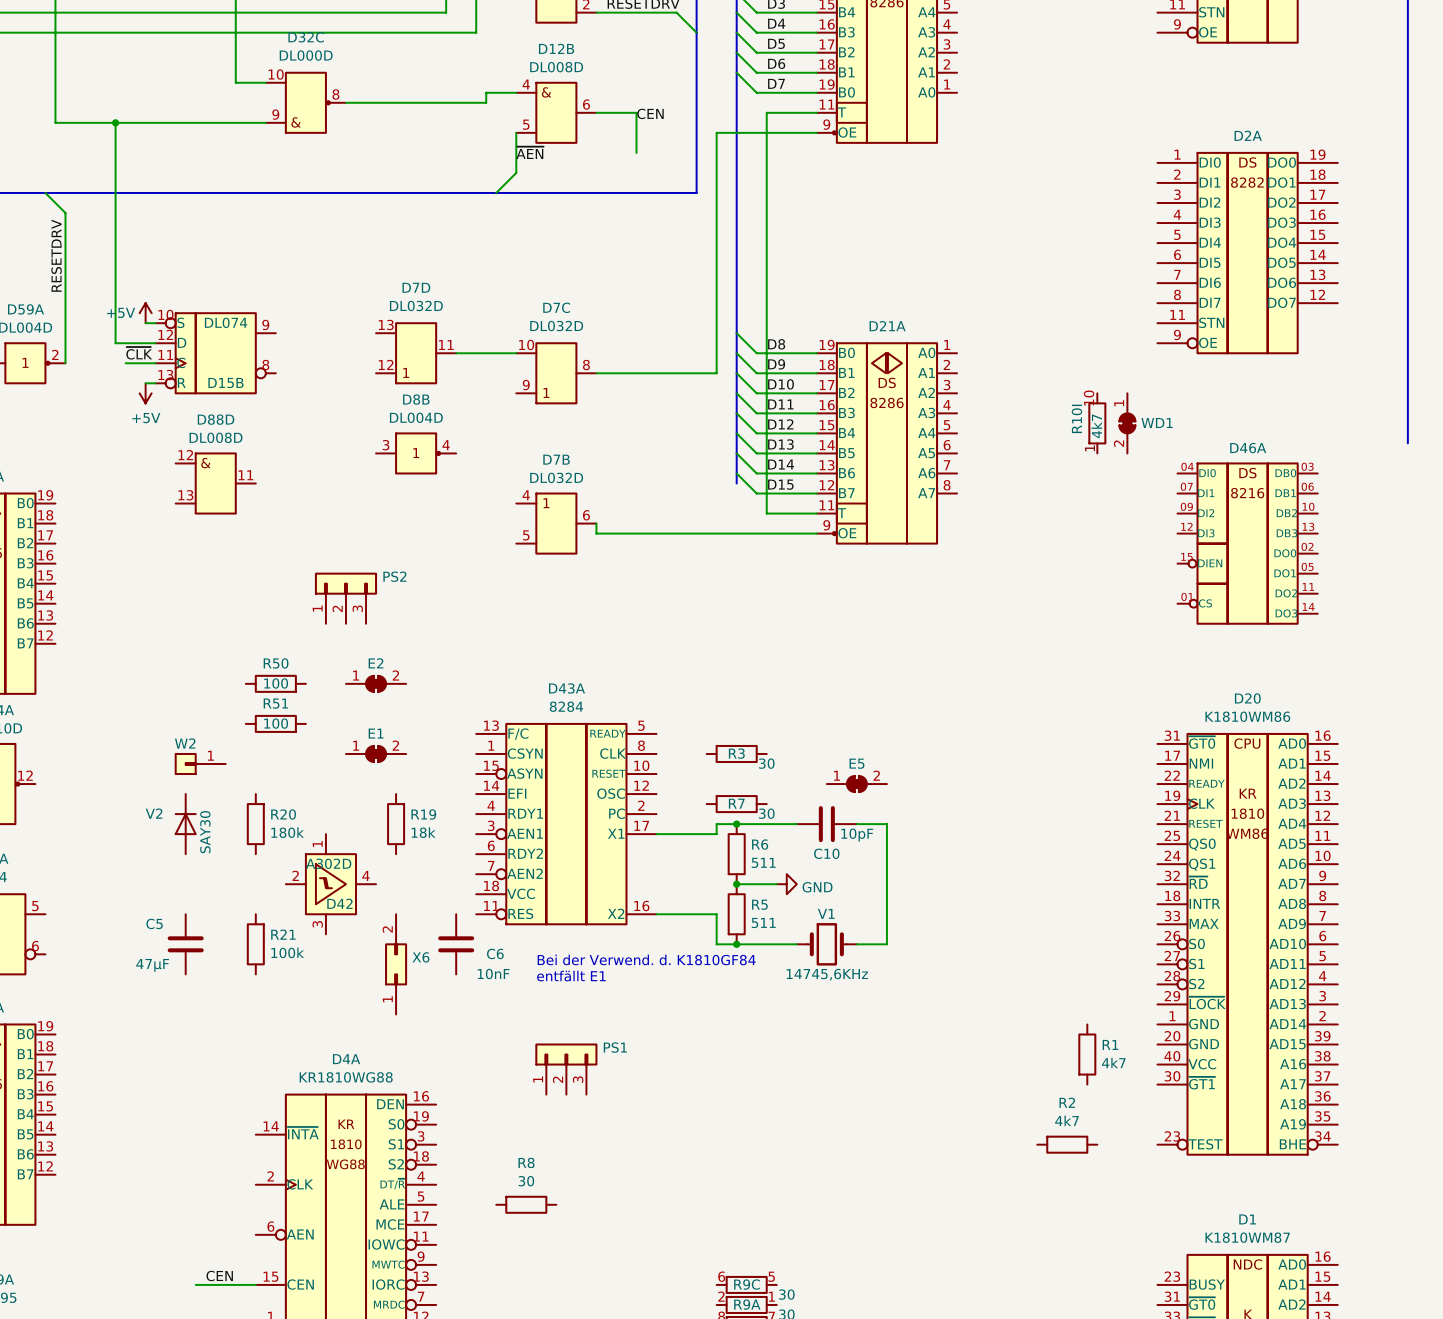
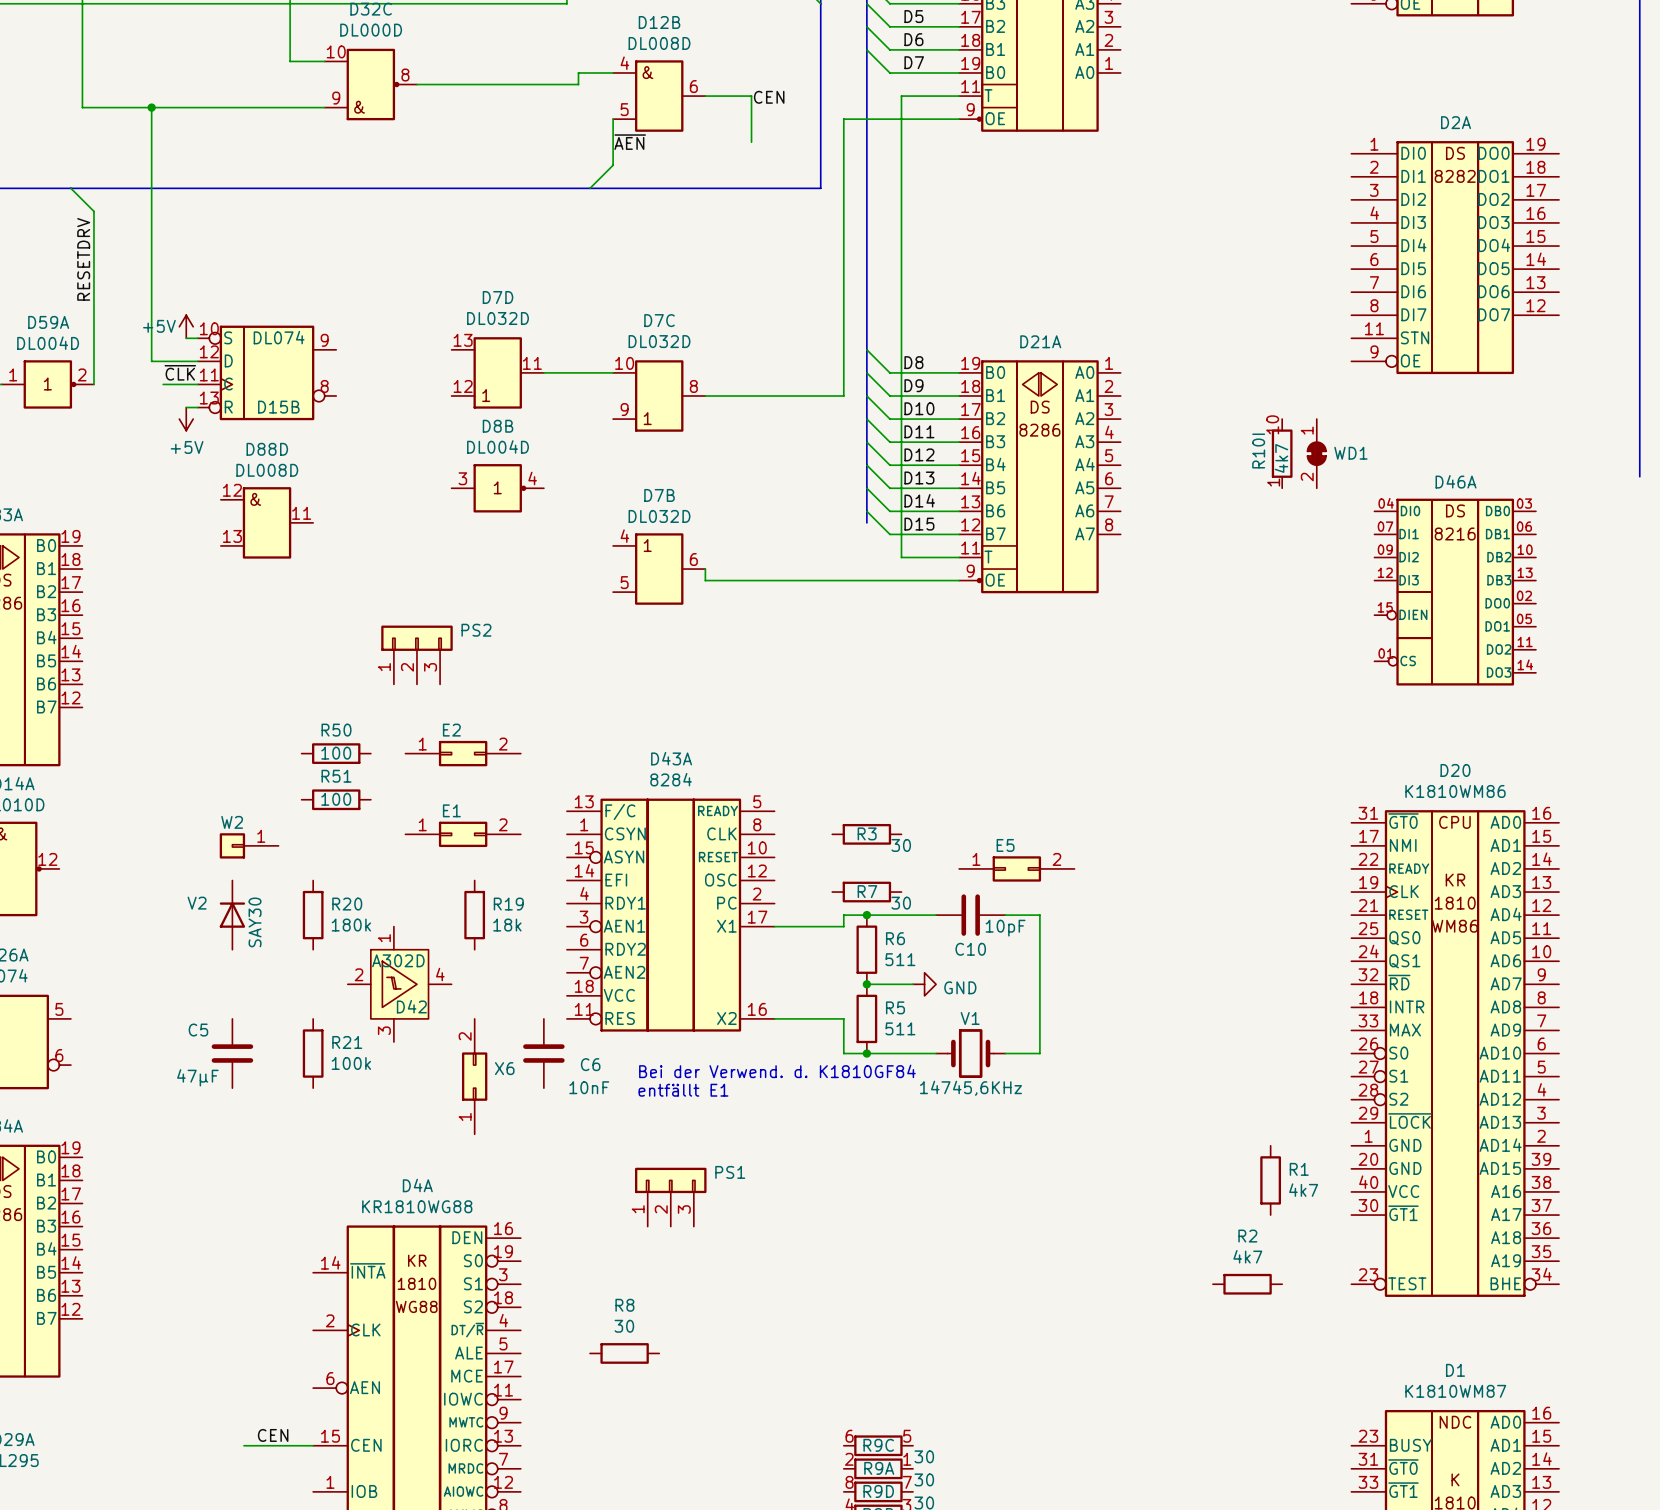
E2 symbol: [345, 675, 407, 692] -> [405, 740, 521, 767]
E1 symbol: [345, 745, 407, 762] -> [405, 821, 521, 848]
E5 symbol: [826, 776, 887, 793] -> [959, 856, 1075, 882]

